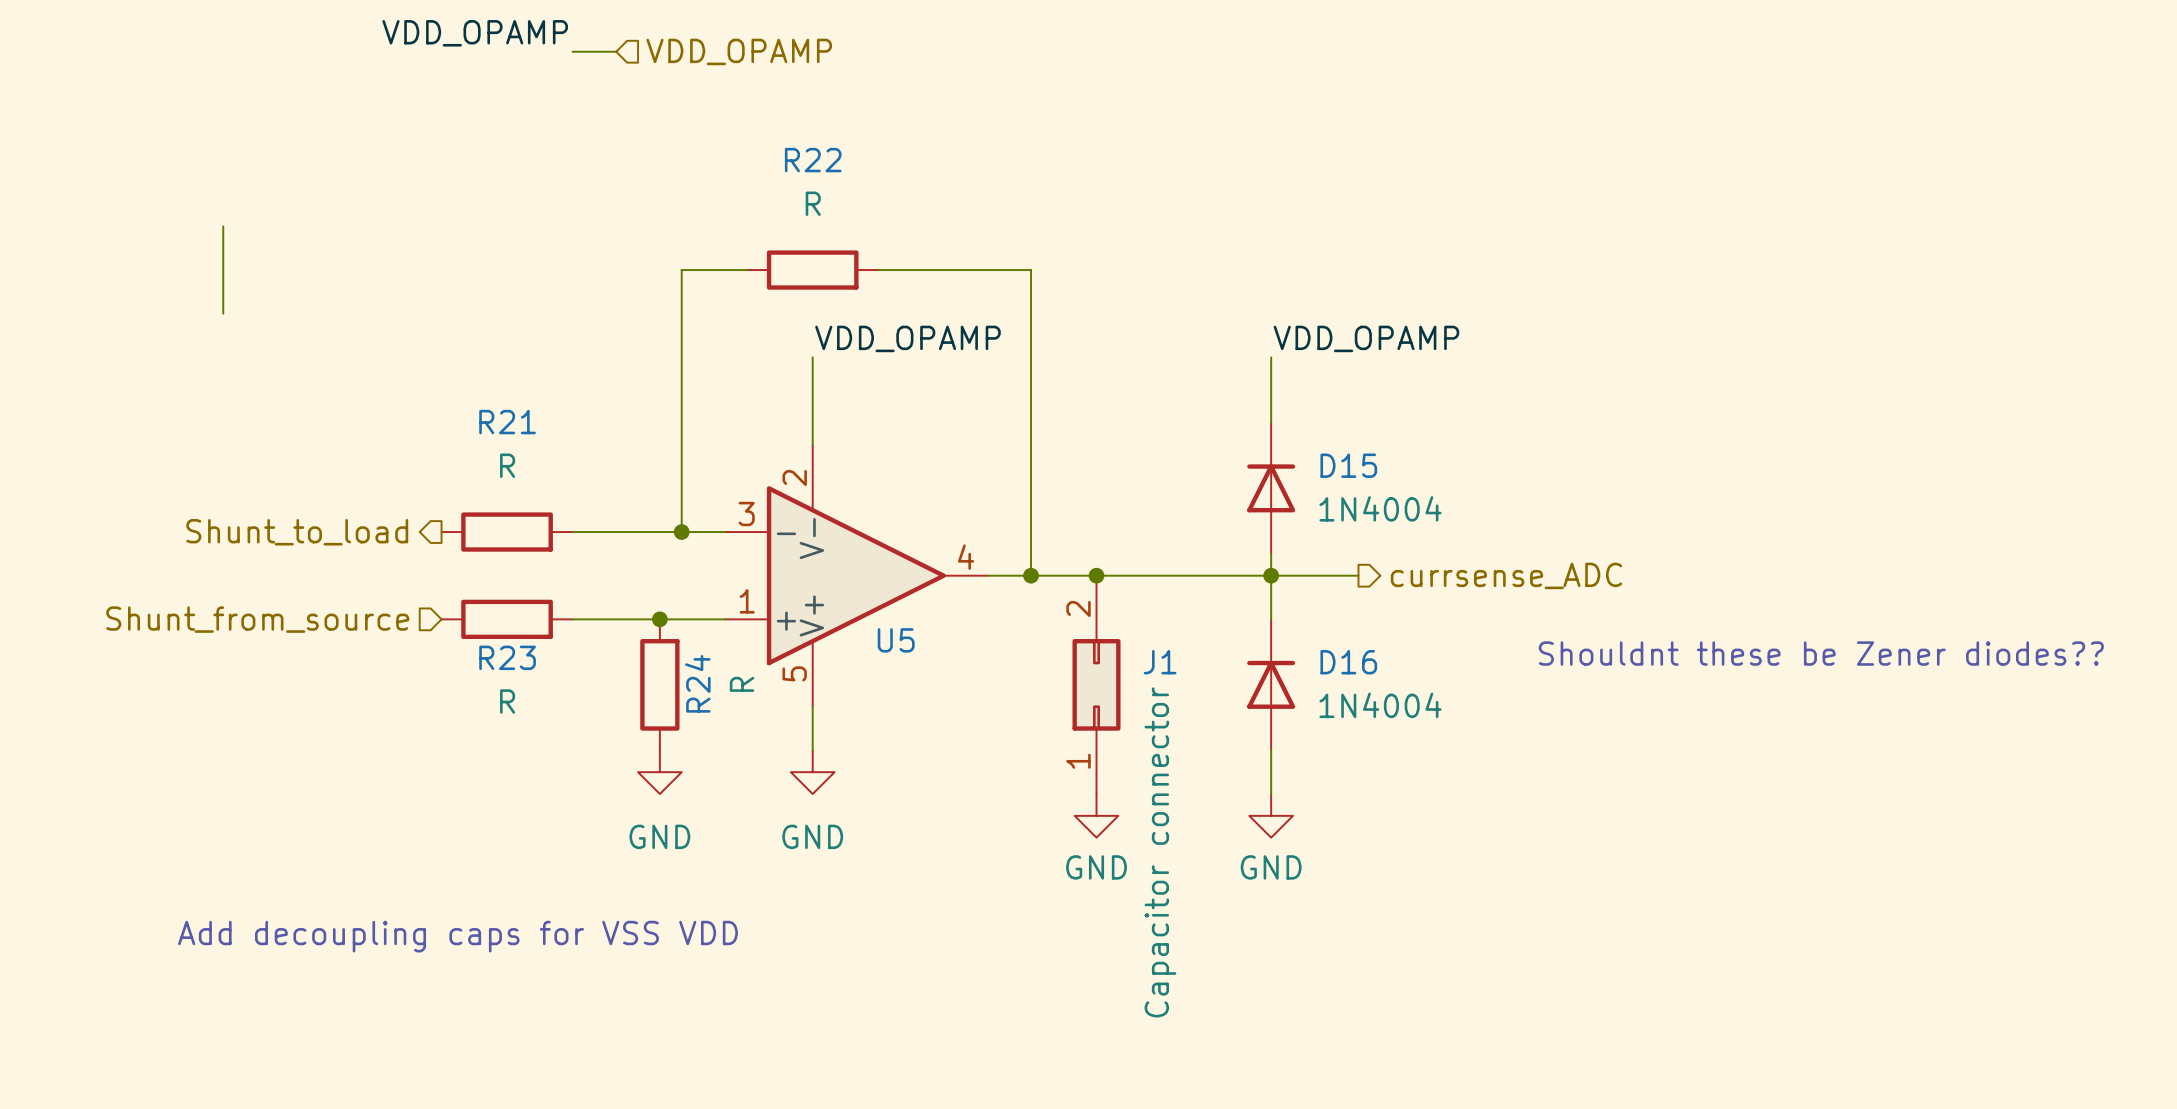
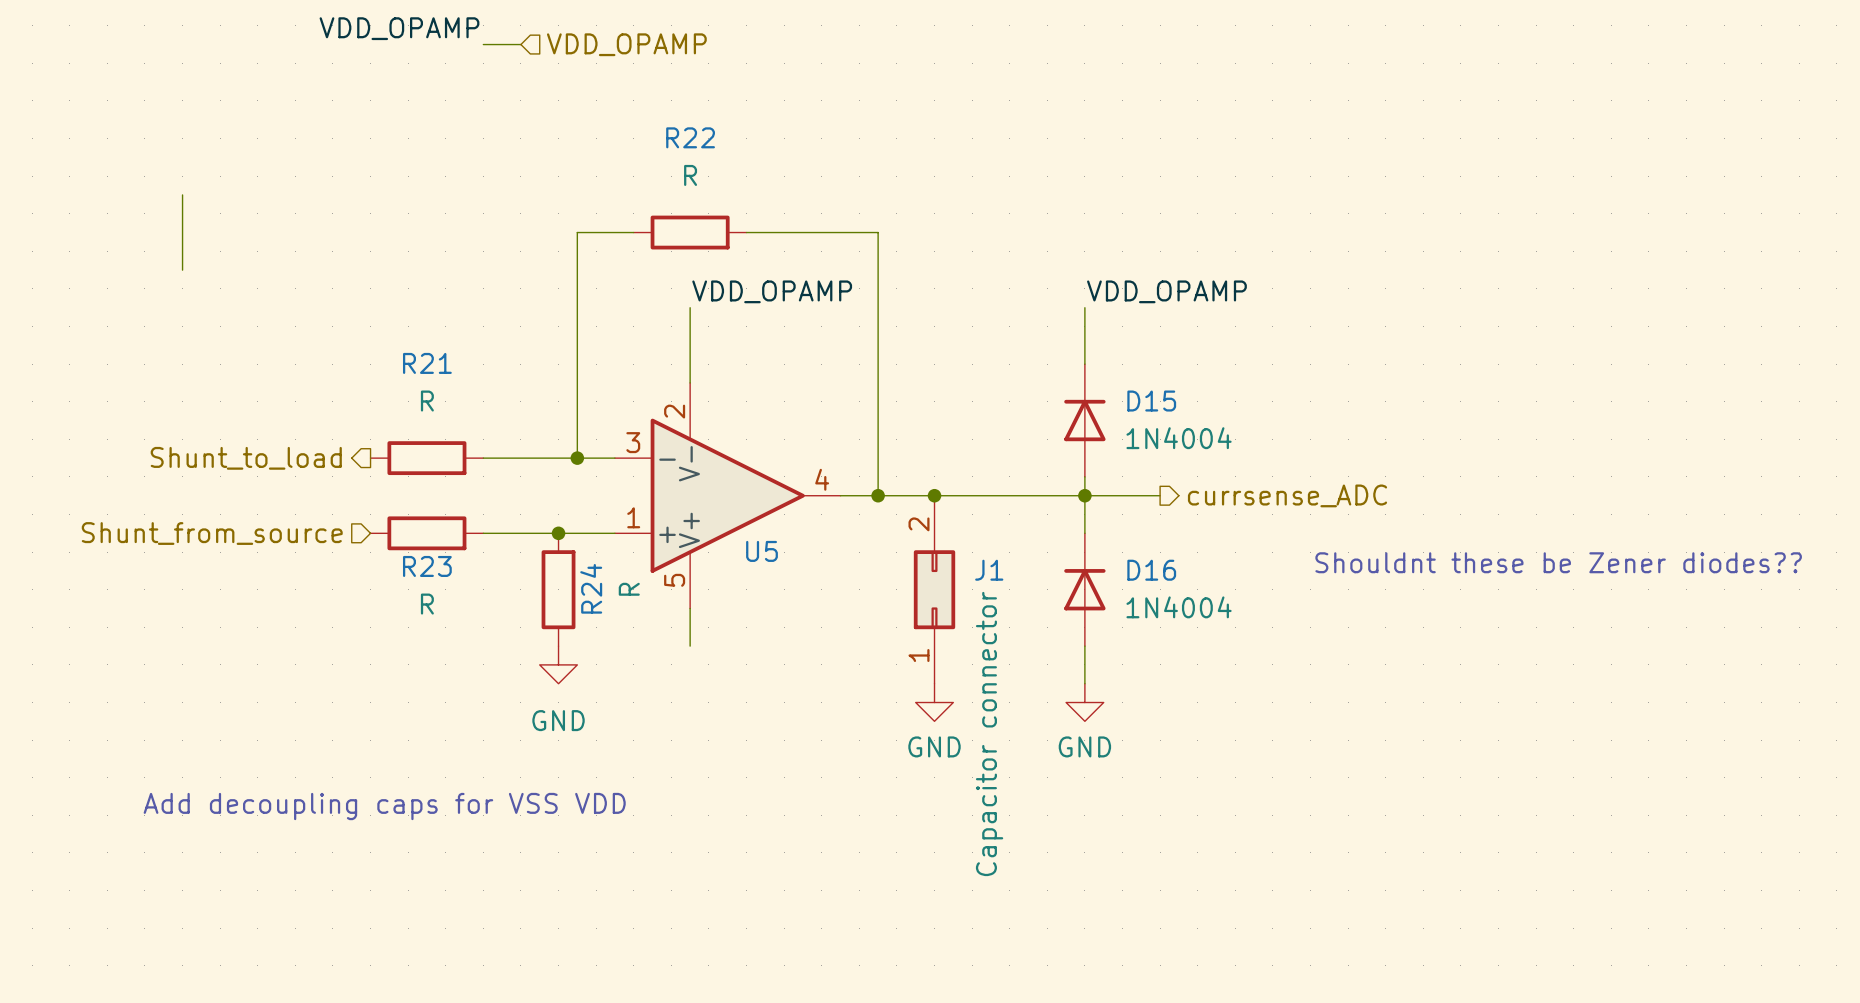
power symbol: GND (812, 772) -> none

